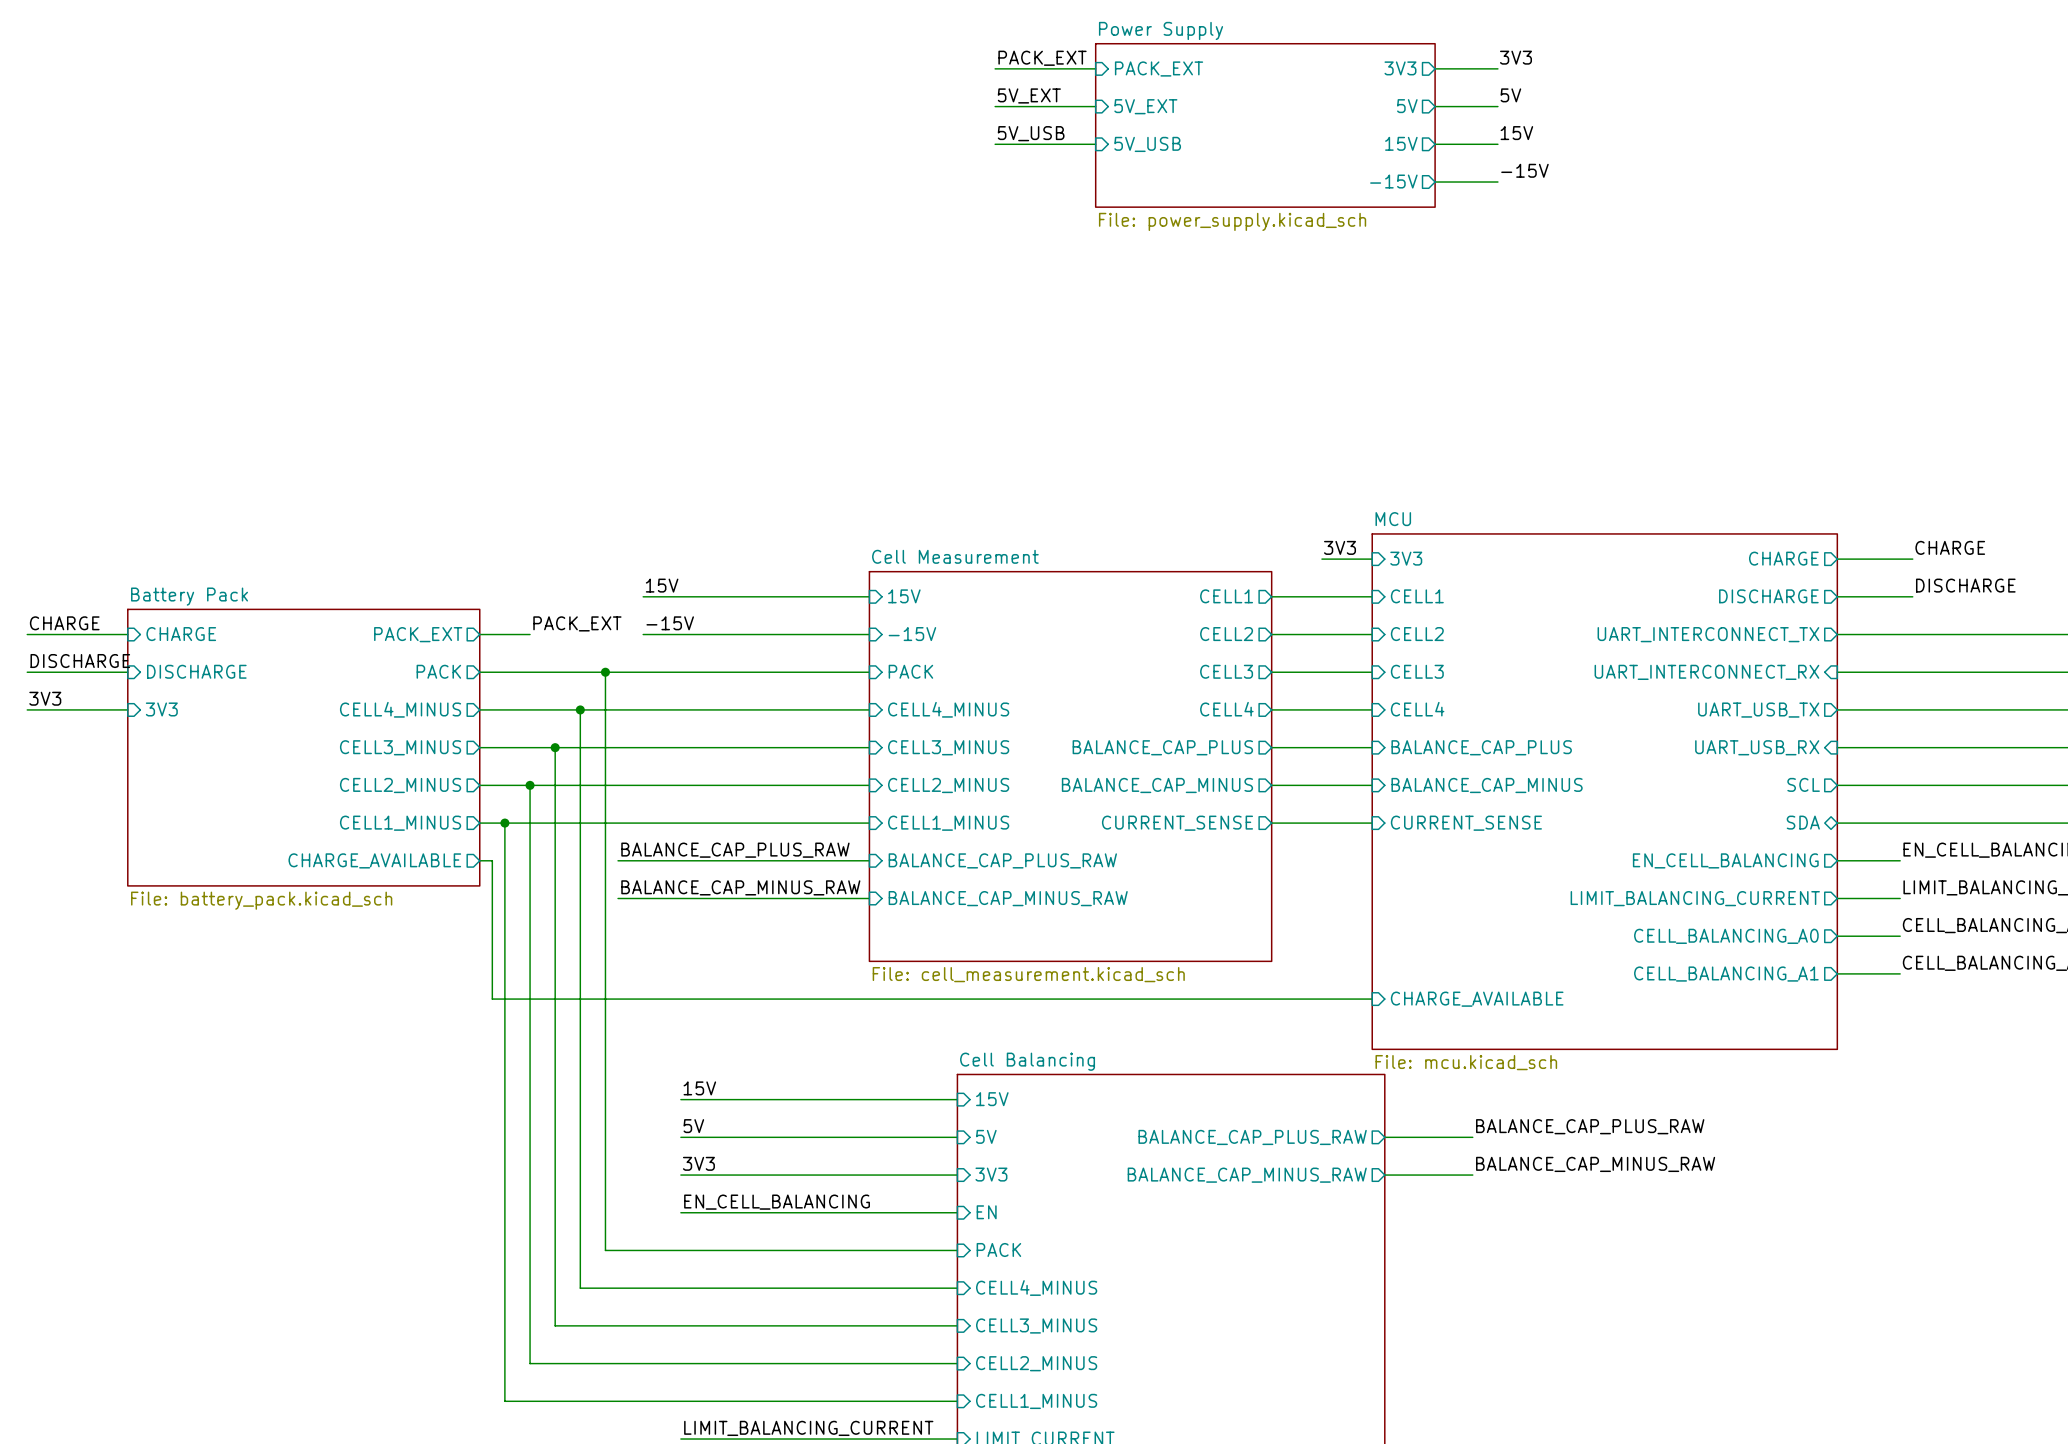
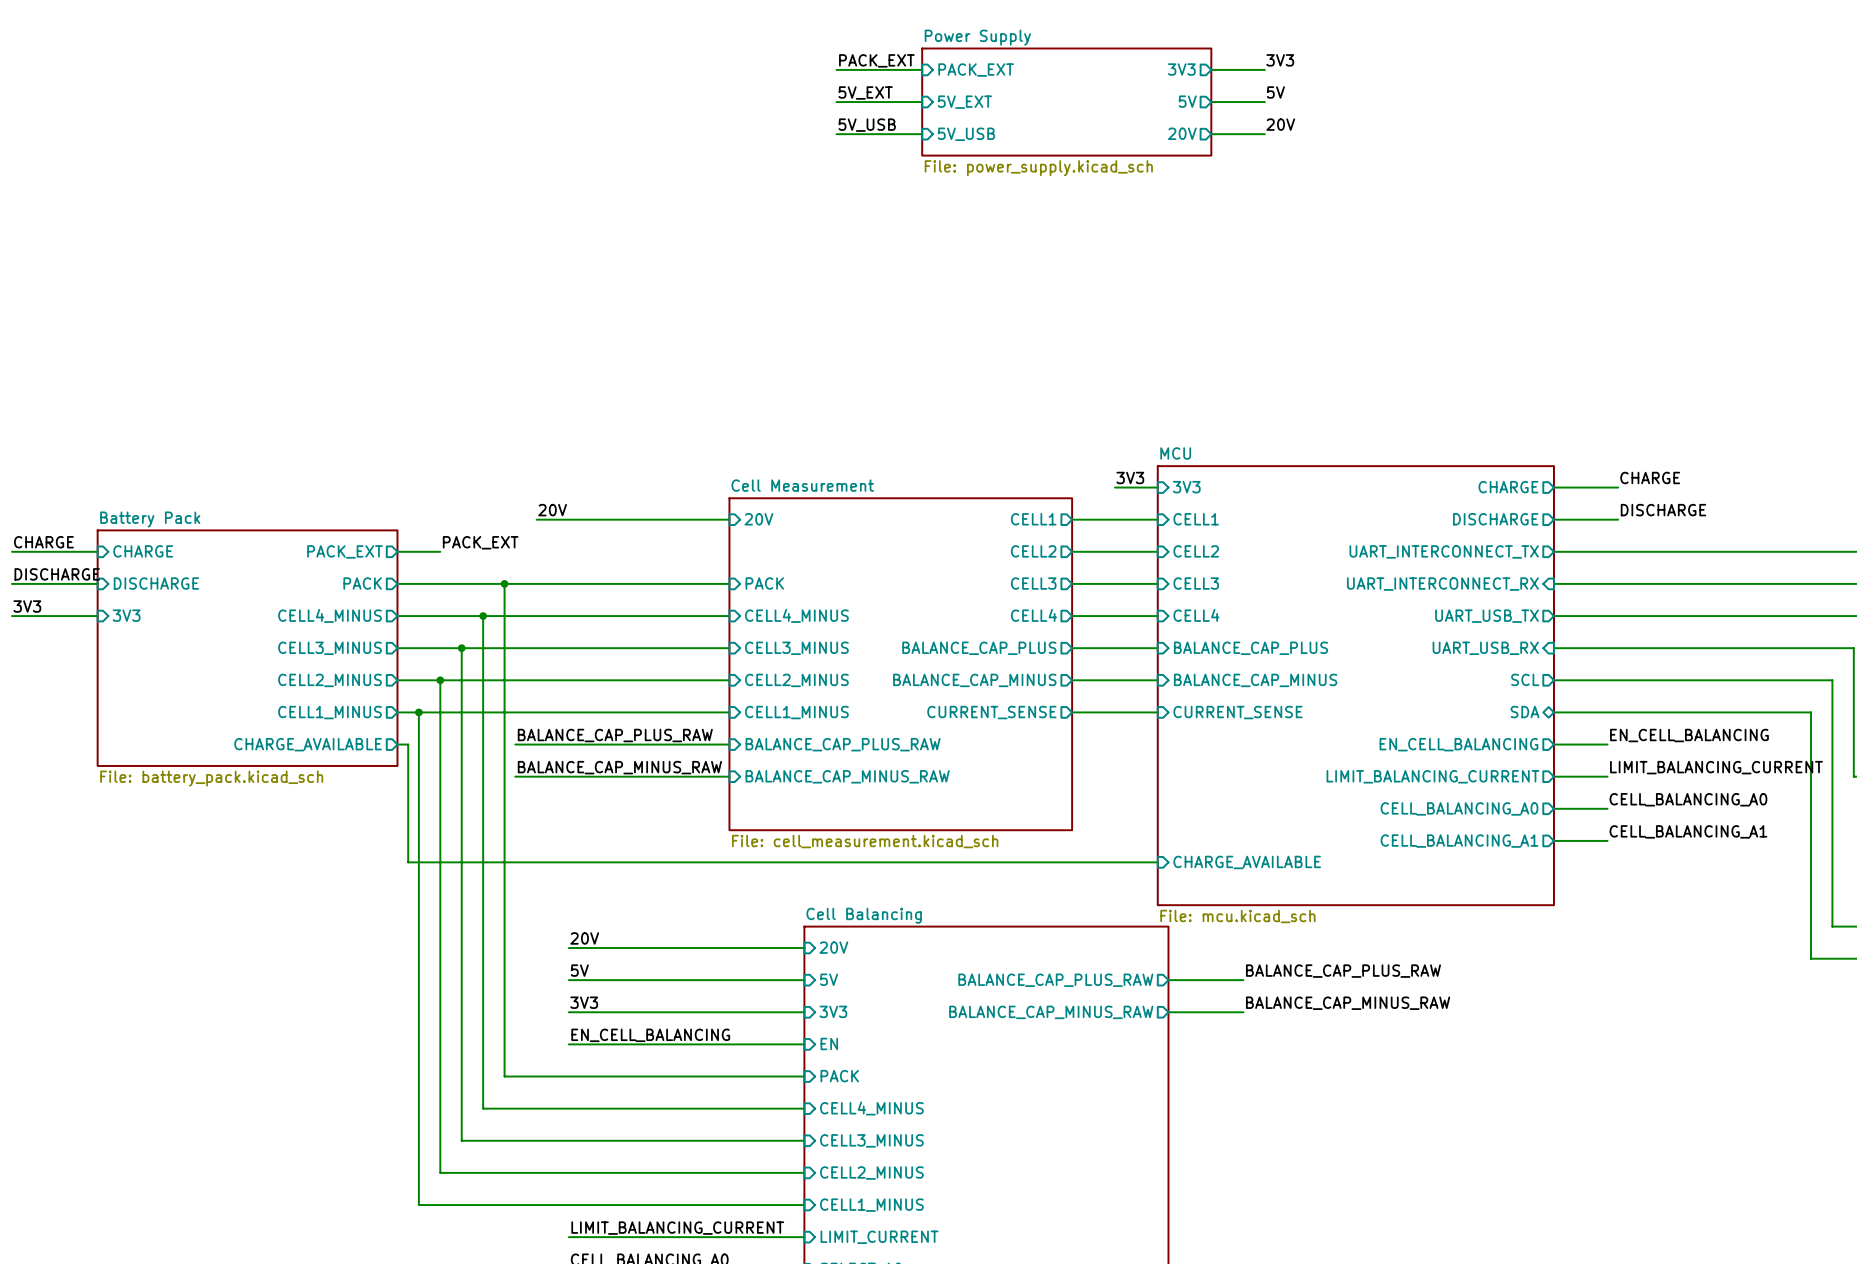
sheet Power Supply: none -> File: power_supply.kicad_sch (1066, 102)
sheet Power Supply: File: power_supply.kicad_sch (1265, 125) -> none
label: 15V (1516, 133) -> 20V (1280, 124)
sheet pin: 15V (1401, 143) -> 20V (1182, 133)
label: -15V (1524, 170) -> none
sheet pin: -15V (1393, 181) -> none
wire: (1435, 182) (1497, 182) -> none
label: 15V (662, 585) -> 20V (552, 510)
sheet pin: 15V (904, 596) -> 20V (758, 519)
label: -15V (670, 623) -> none
wire: (643, 634) (869, 634) -> none
sheet pin: -15V (912, 634) -> none
label: 15V (699, 1088) -> 20V (584, 938)
sheet pin: 15V (992, 1099) -> 20V (833, 947)

